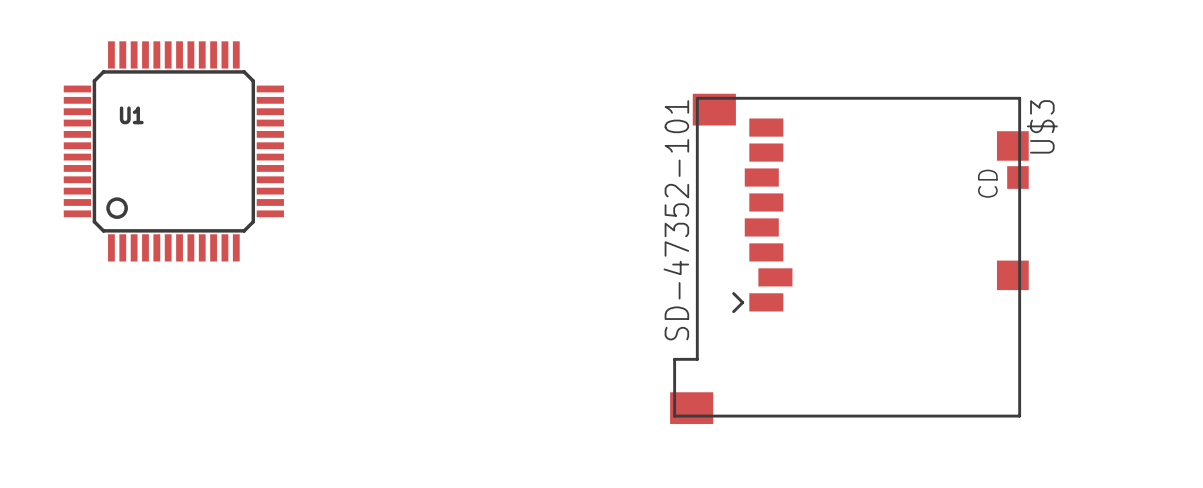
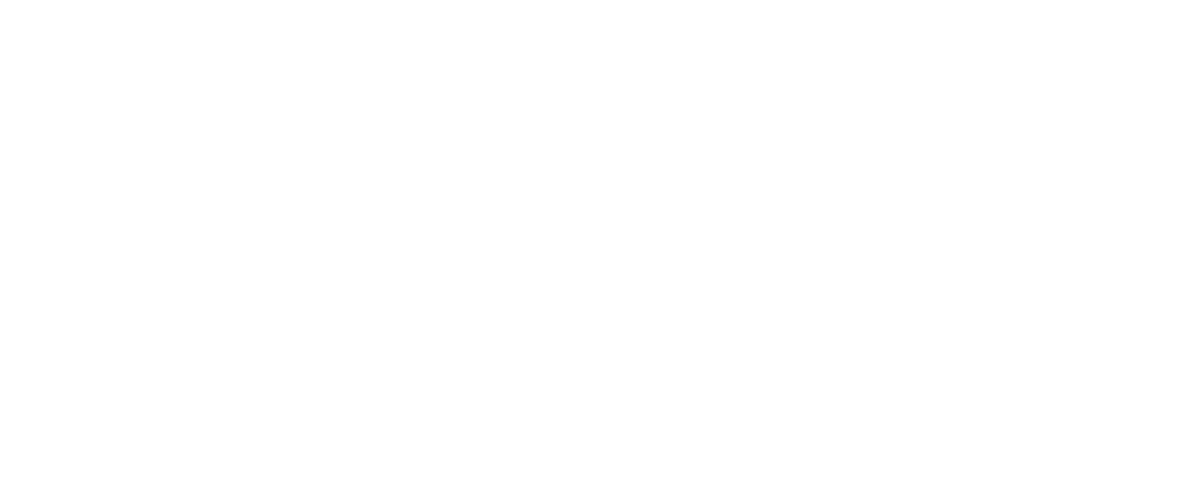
U1: (173, 151) -> none
U$3: (849, 258) -> none

